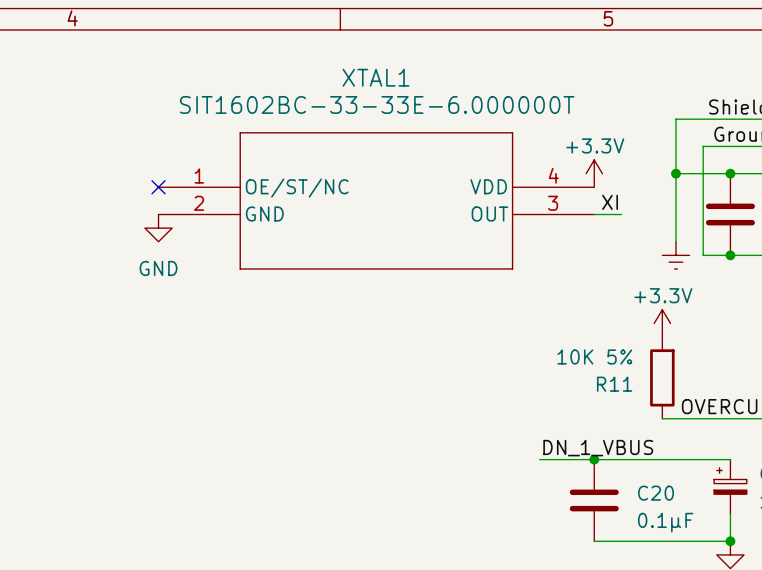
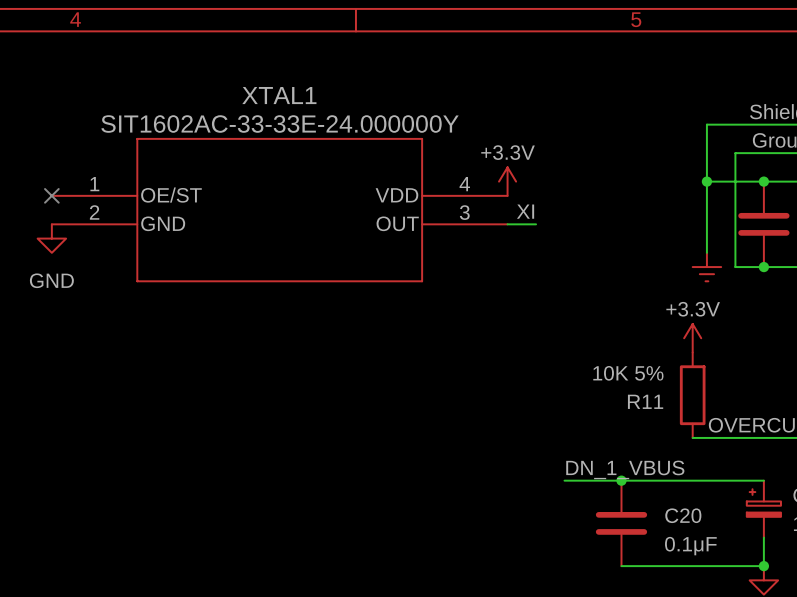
XTAL1 name position: XTAL1 (376, 77) -> XTAL1 (279, 95)
XTAL1 value: SIT1602BC-33-33E-6.000000T (377, 104) -> SIT1602AC-33-33E-24.000000Y (280, 124)
power symbol position: +3.3V (594, 173) -> +3.3V (507, 181)
no-connect mark: none -> (51, 195)
no-connect mark: (158, 187) -> none
XTAL1 pin name: OE/ST/NC (297, 188) -> OE/ST (171, 195)
XTAL1 position: (376, 200) -> (279, 210)
label position: XI (610, 202) -> XI (525, 211)
wire: (594, 214) (621, 214) -> (507, 224) (536, 224)
power symbol position: GND (158, 228) -> GND (51, 238)

